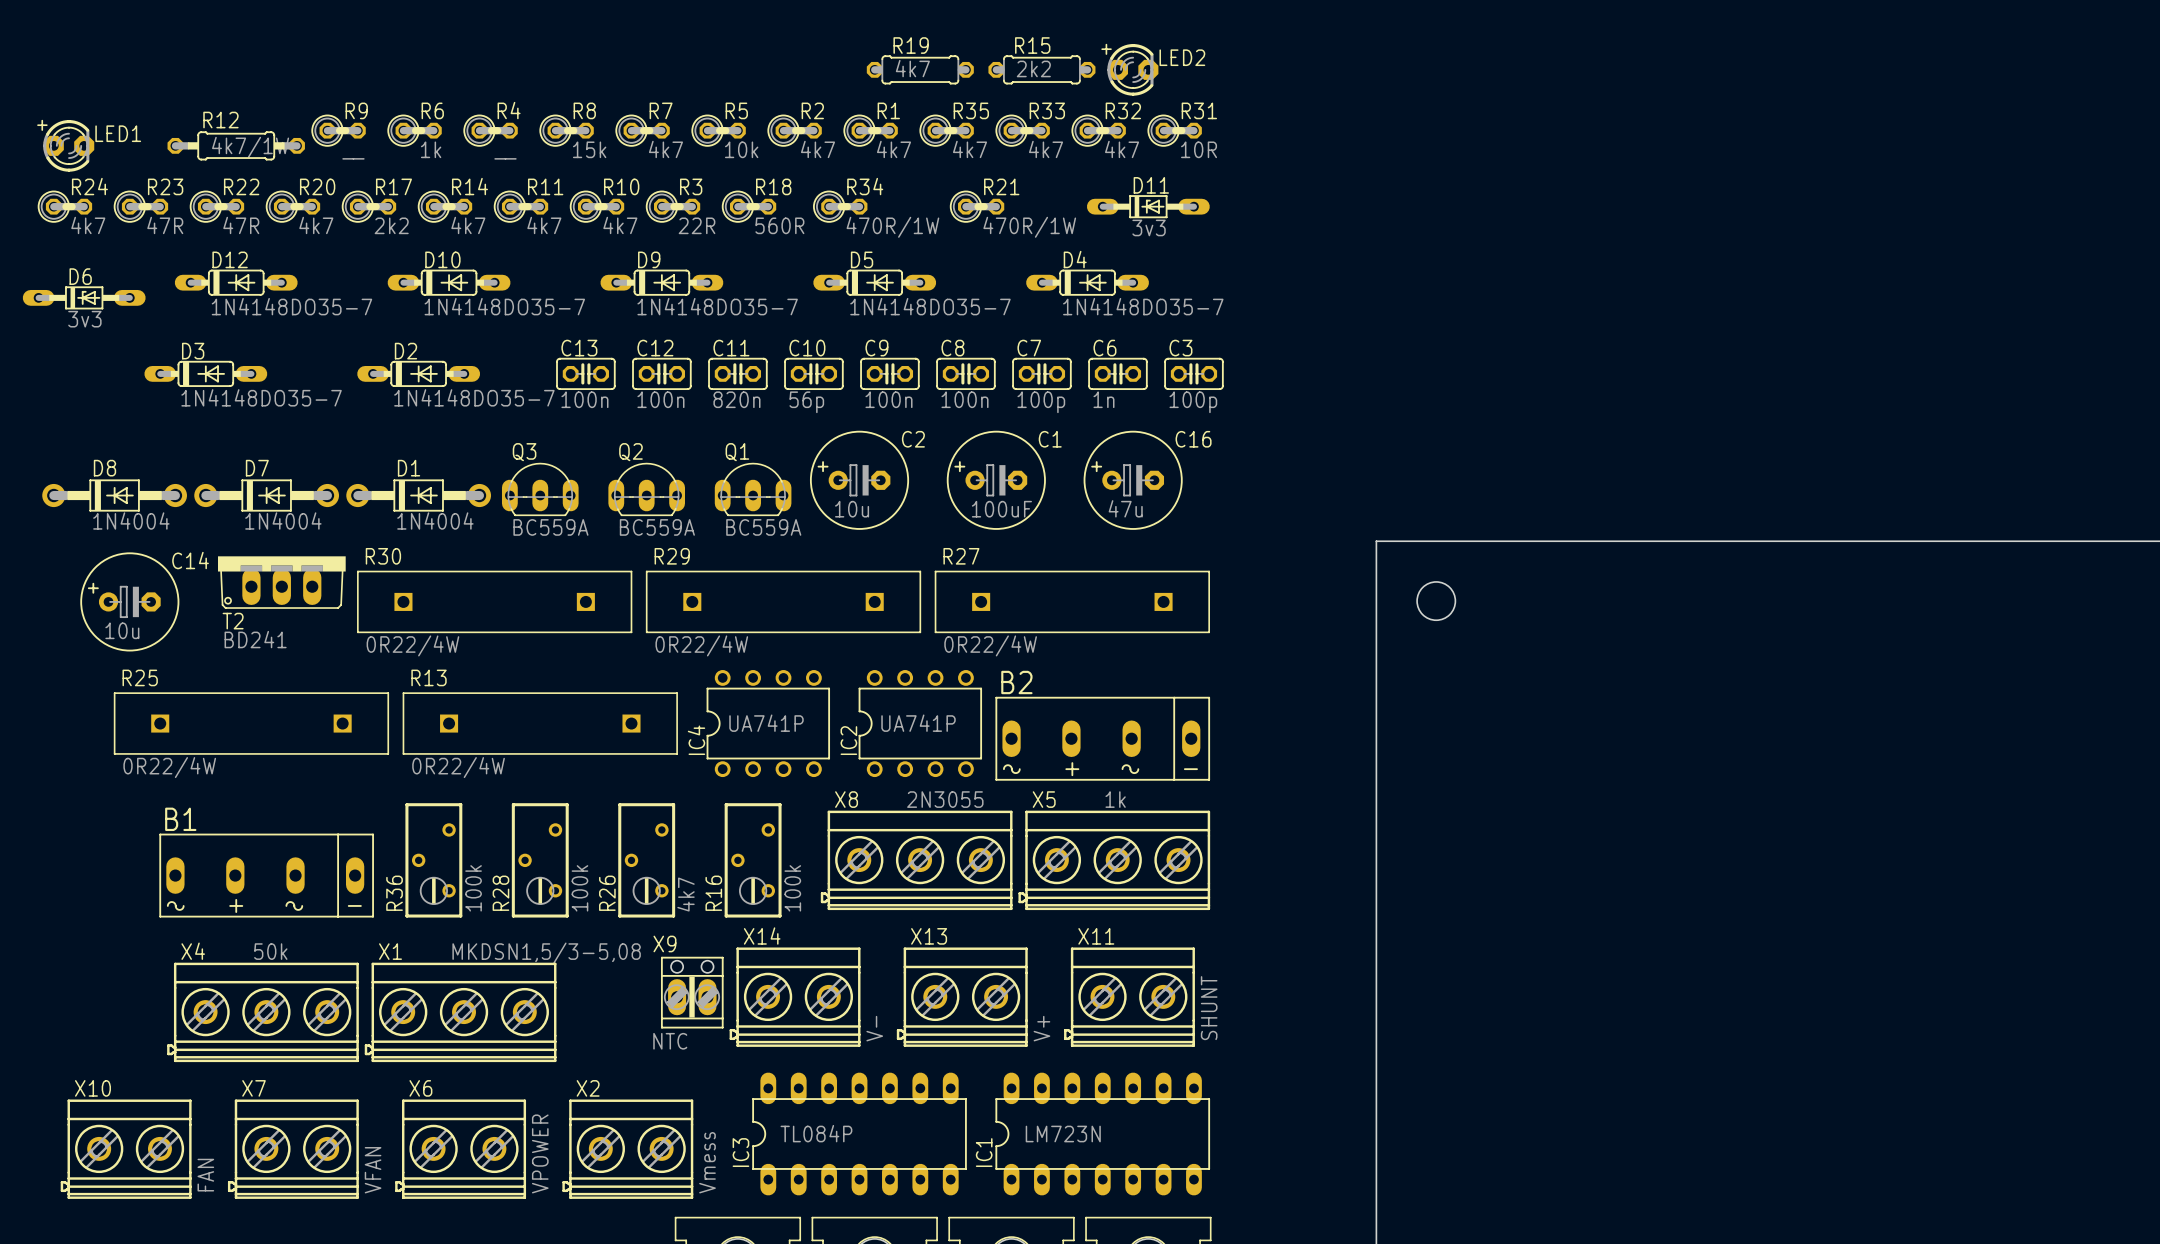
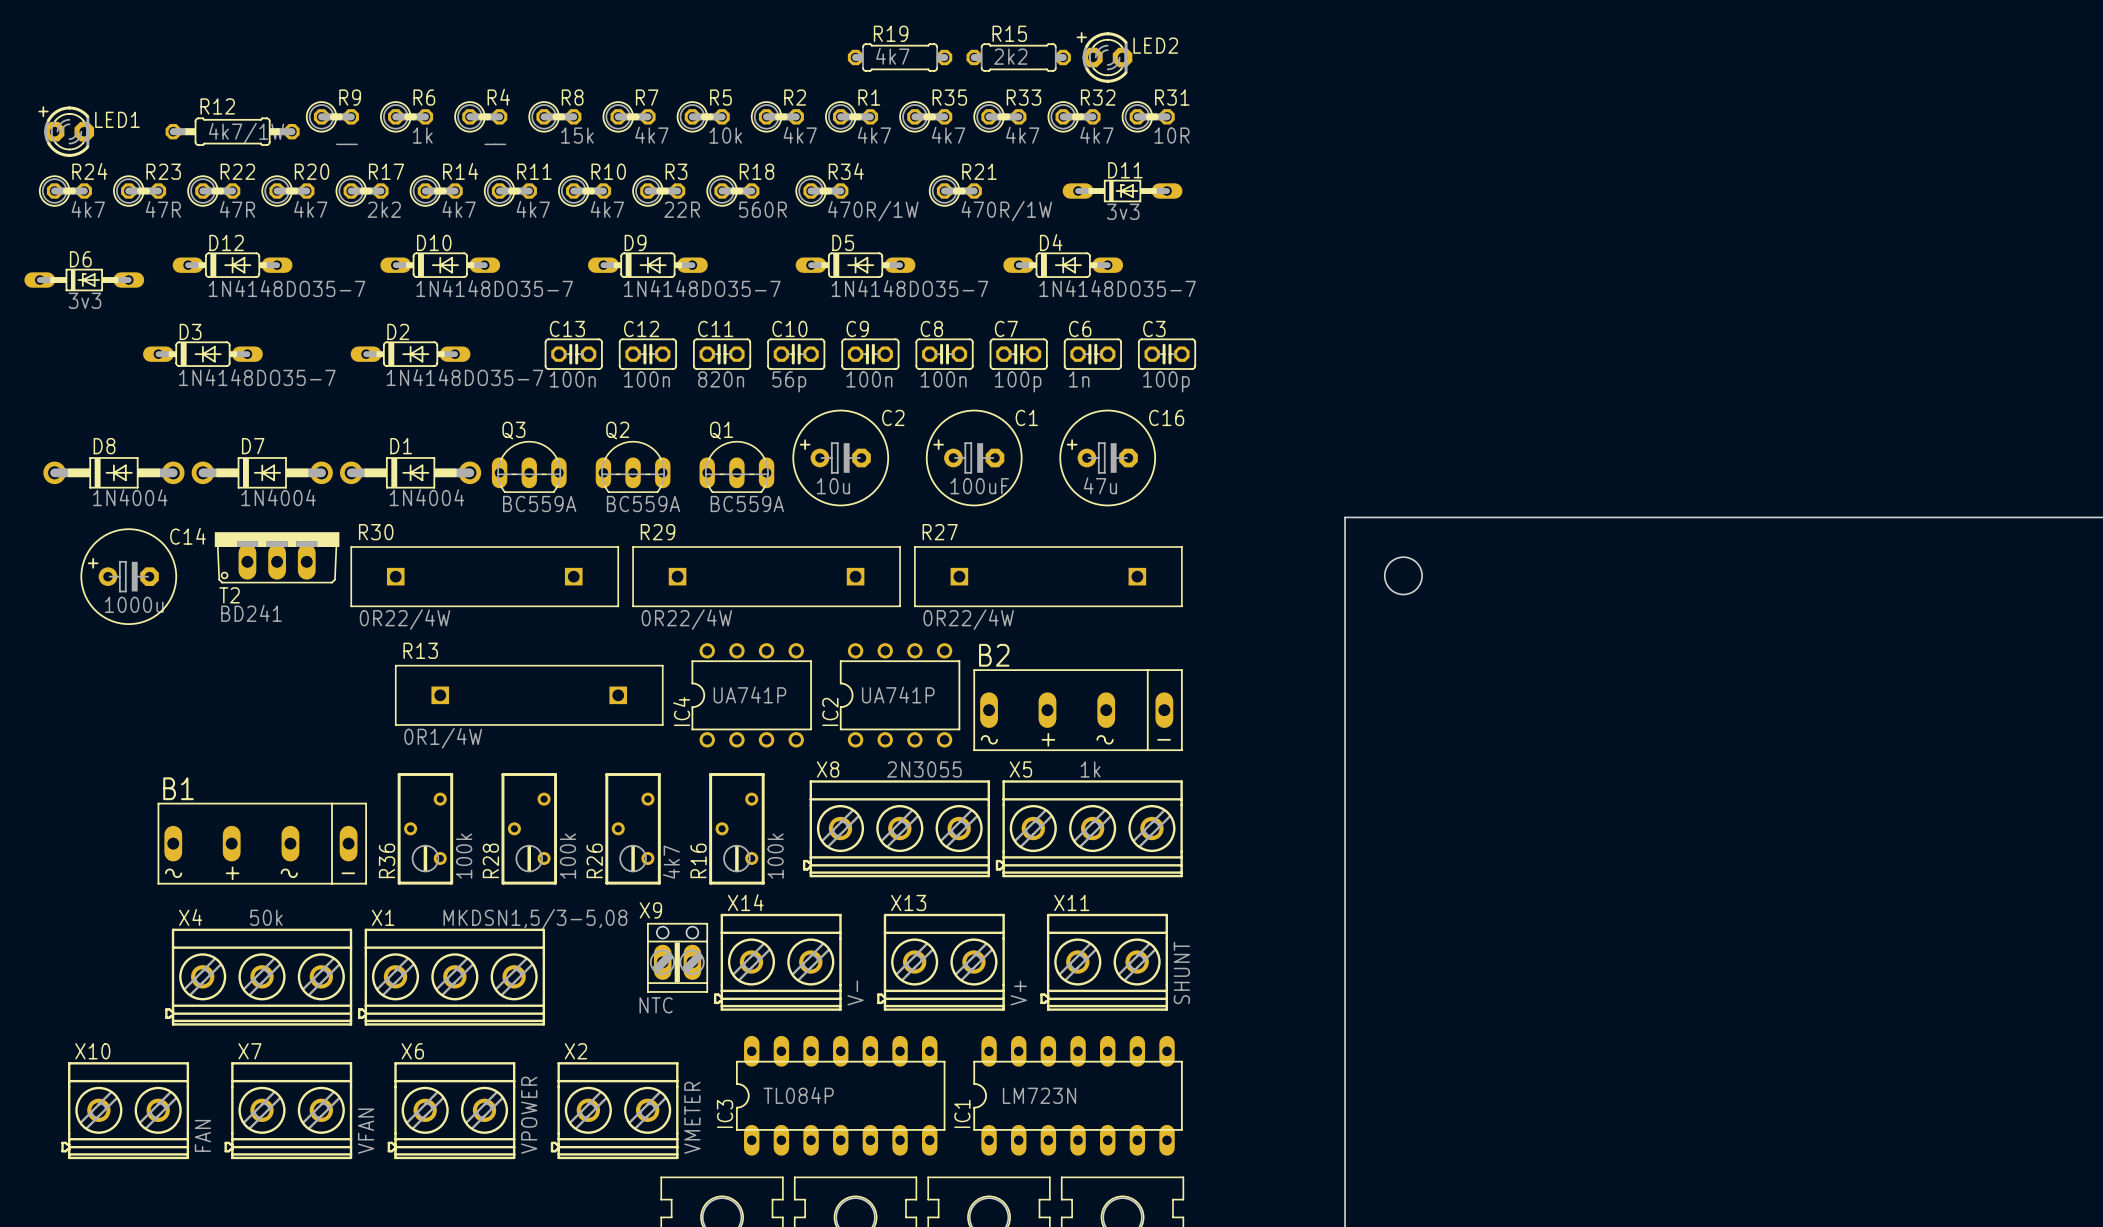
C14 value: 10u (122, 630) -> 1000u (134, 604)
R25: 0R22/4W (251, 723) -> none
R13 value: 0R22/4W (458, 767) -> 0R1/4W (443, 738)
X2 value: Vmess (707, 1162) -> VMETER (692, 1117)

